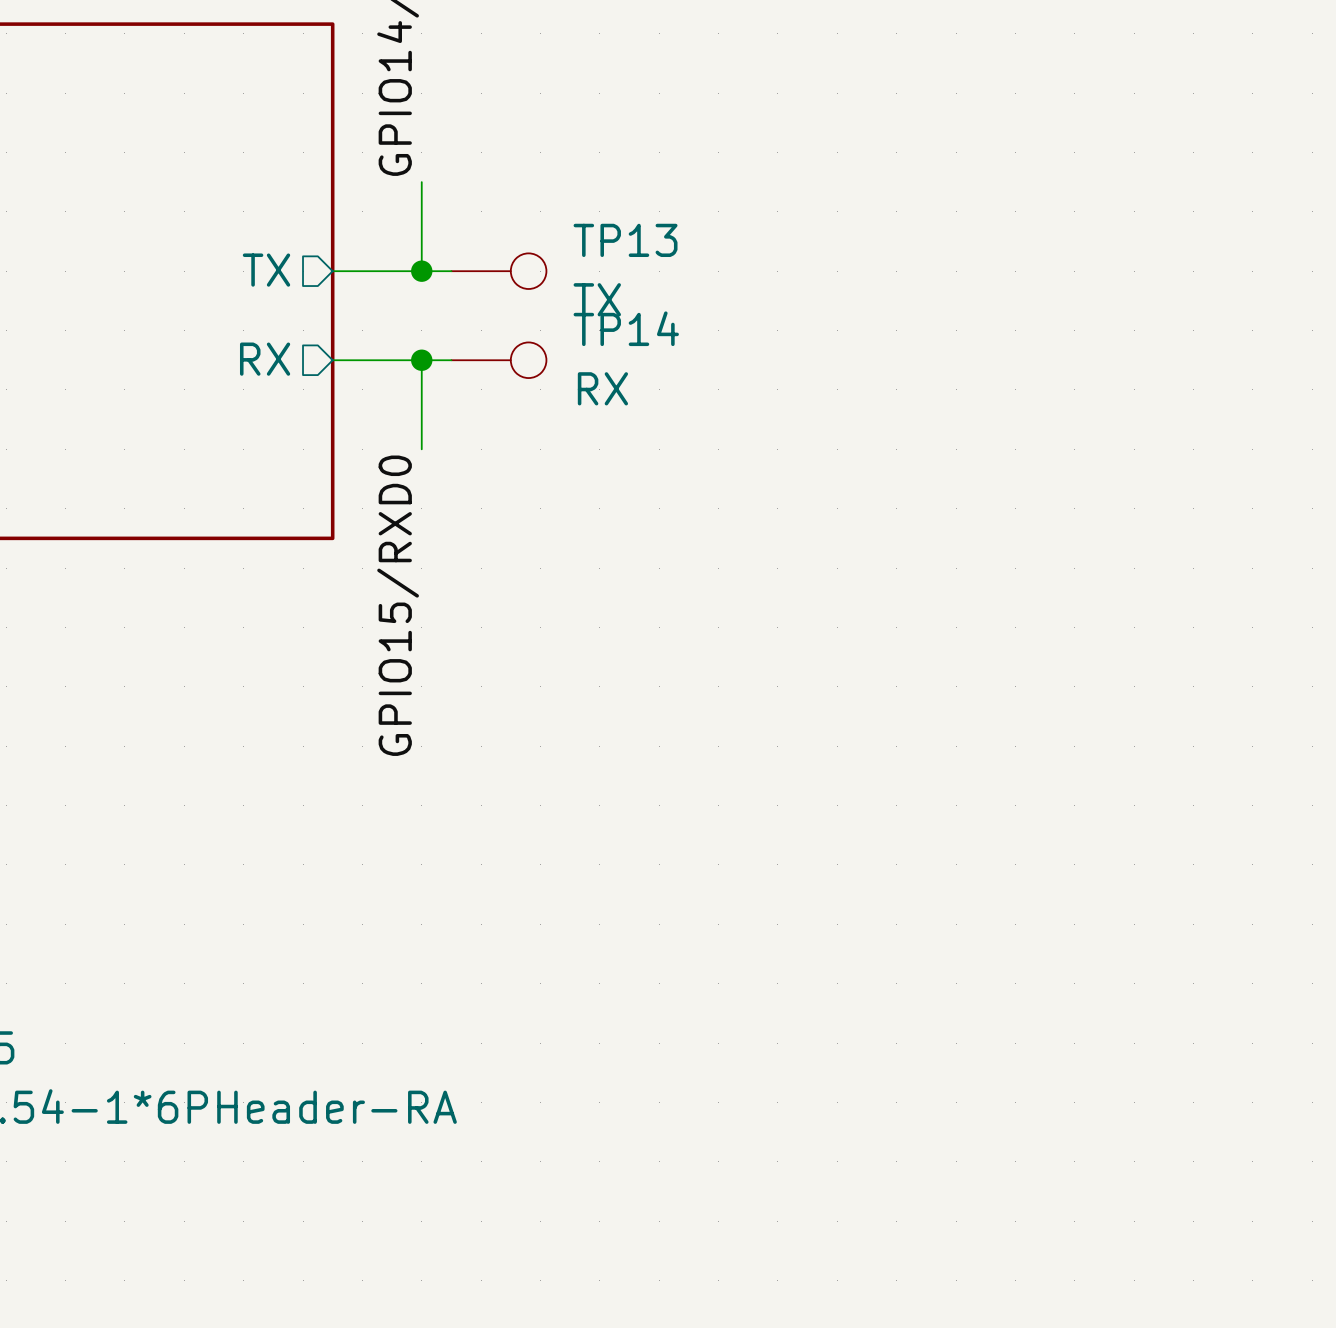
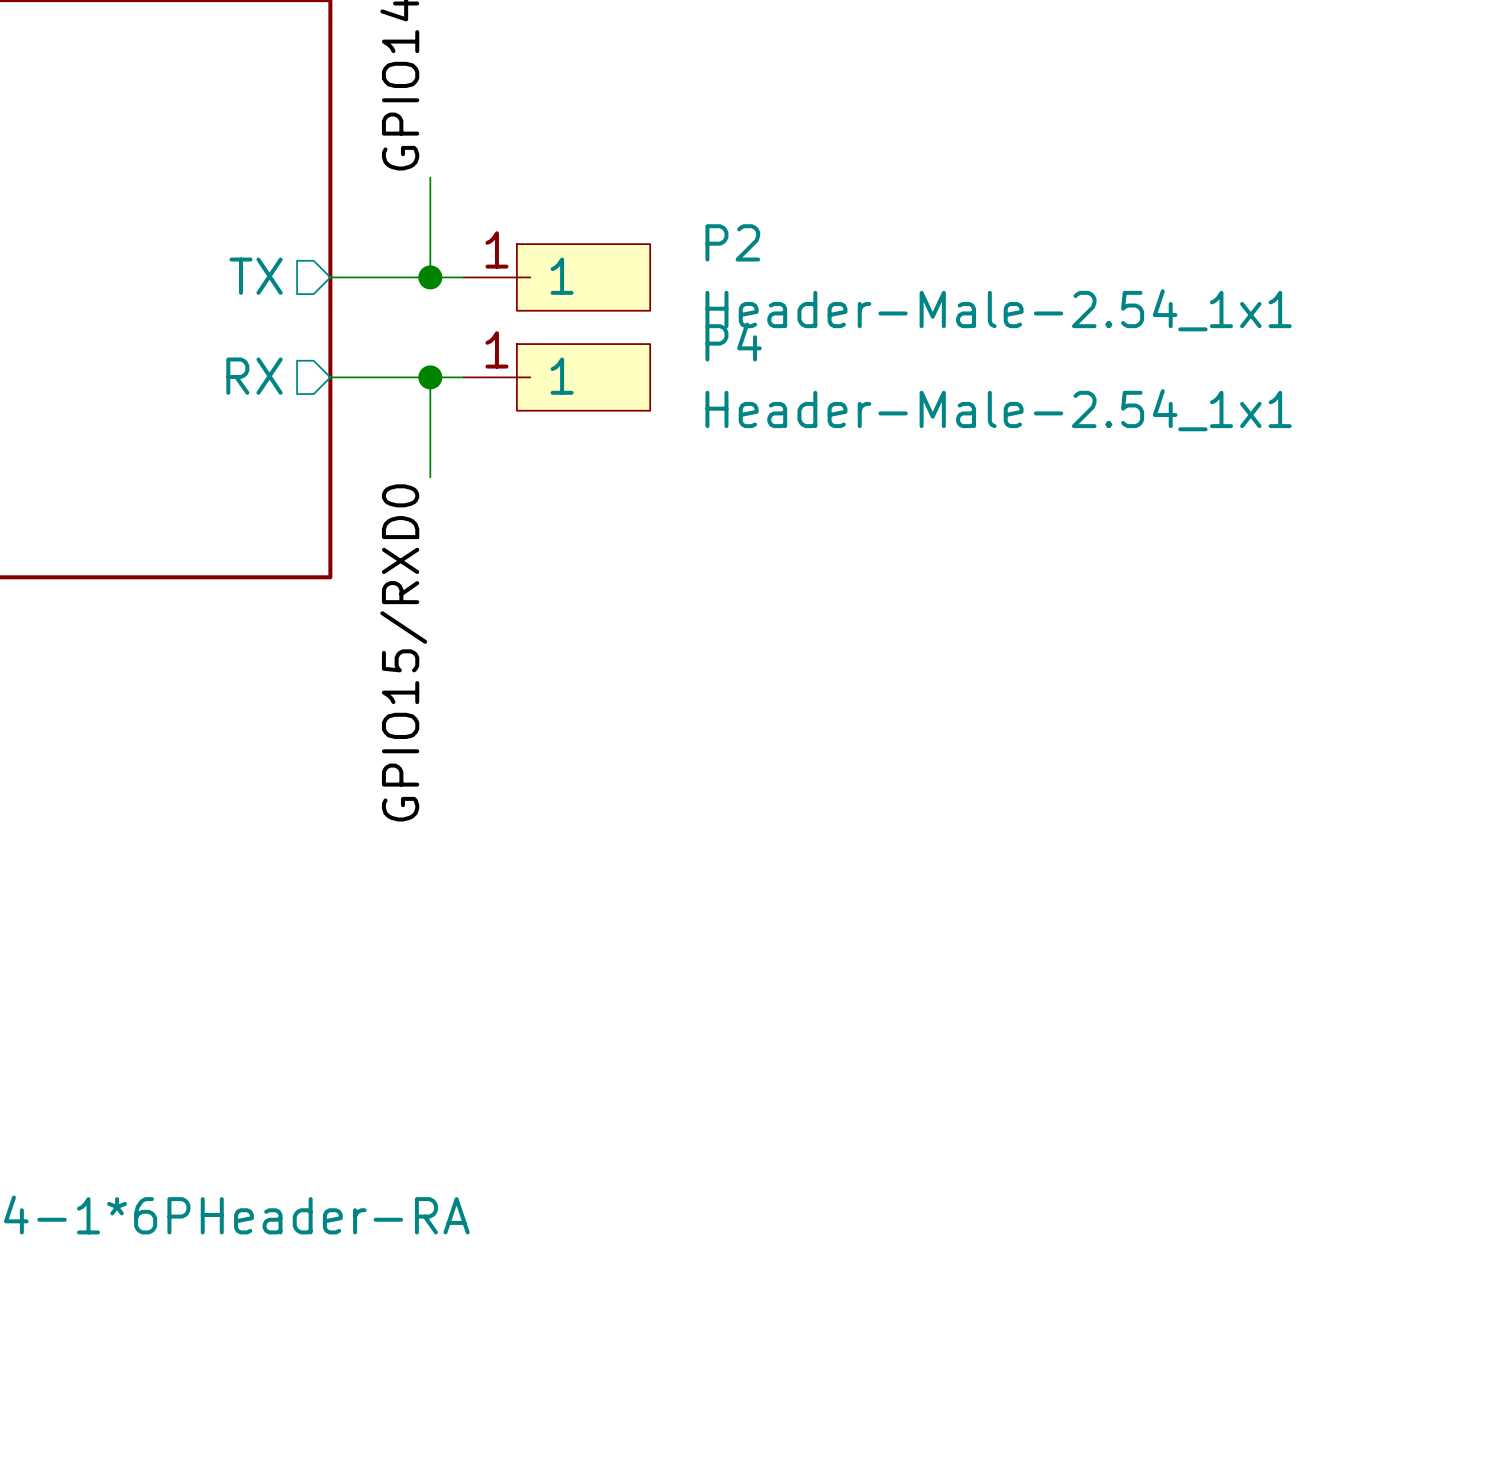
TP13: TX (498, 271) -> none
P2: none -> Header-Male-2.54_1x1 (556, 277)
TP14: RX (498, 360) -> none
P4: none -> Header-Male-2.54_1x1 (556, 377)

